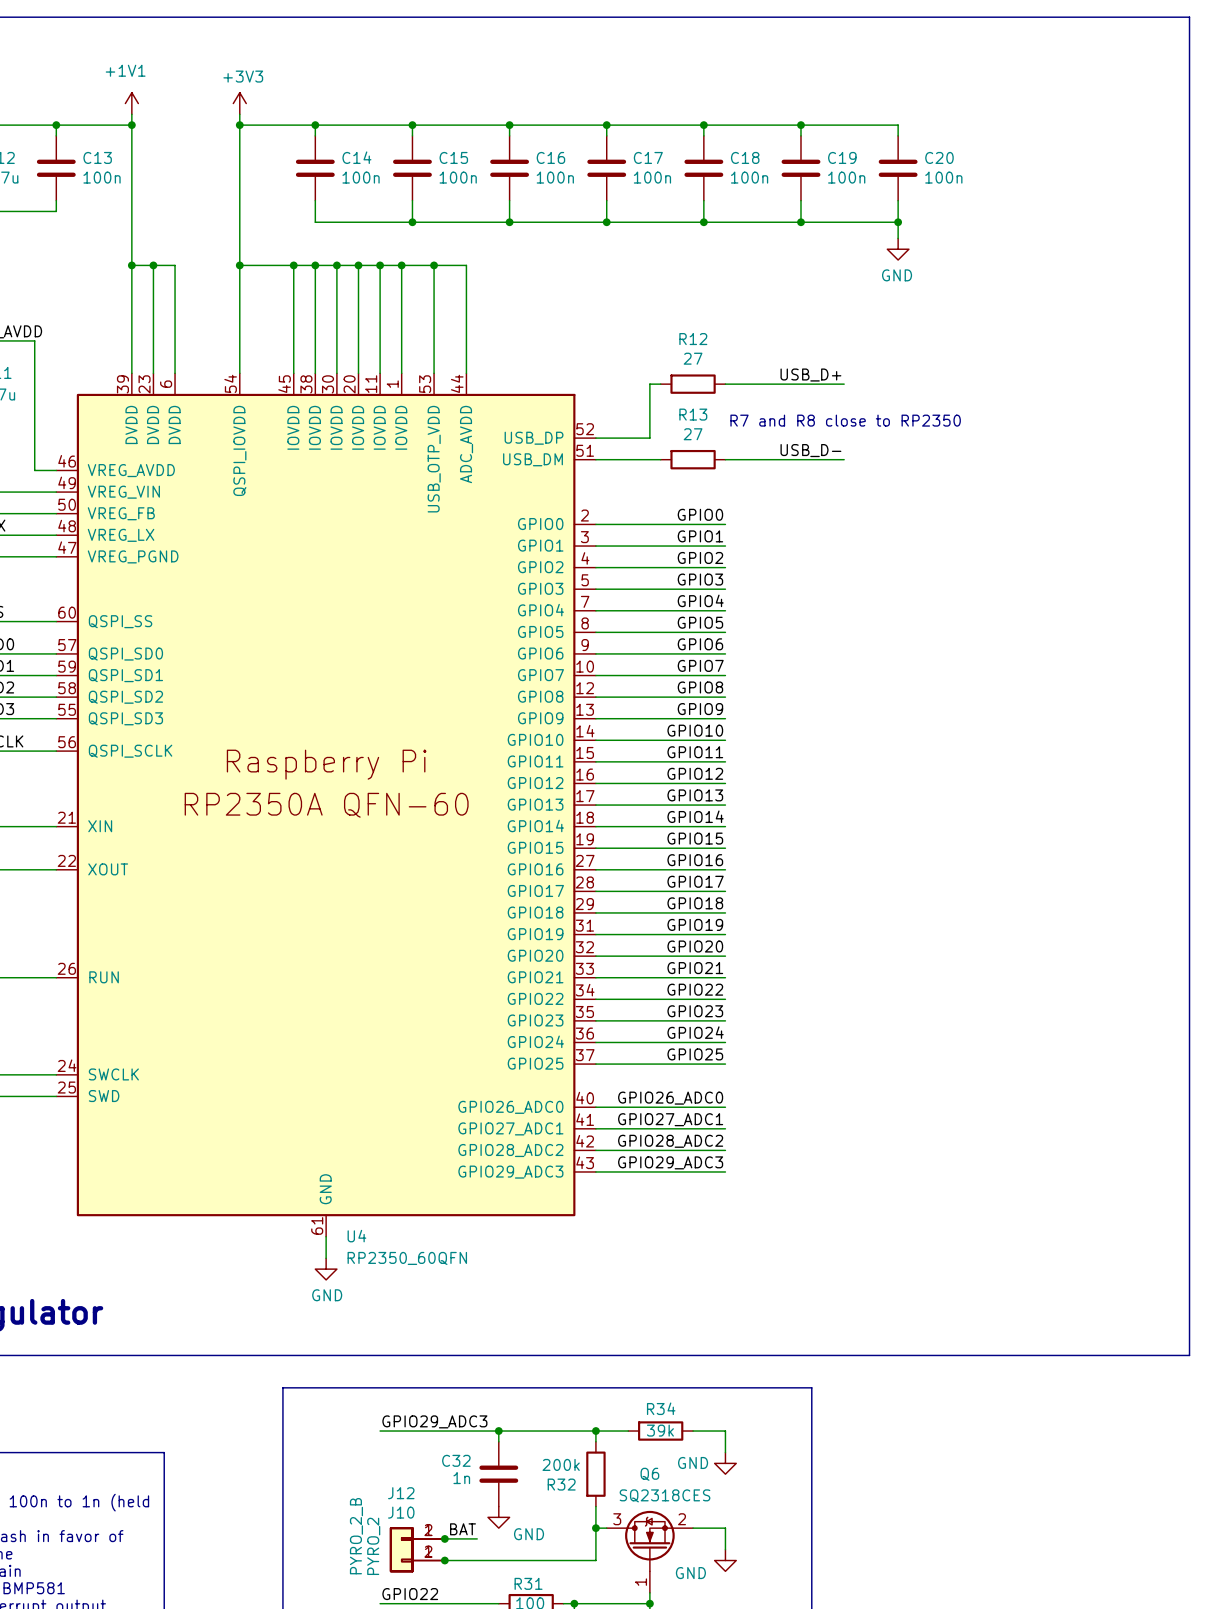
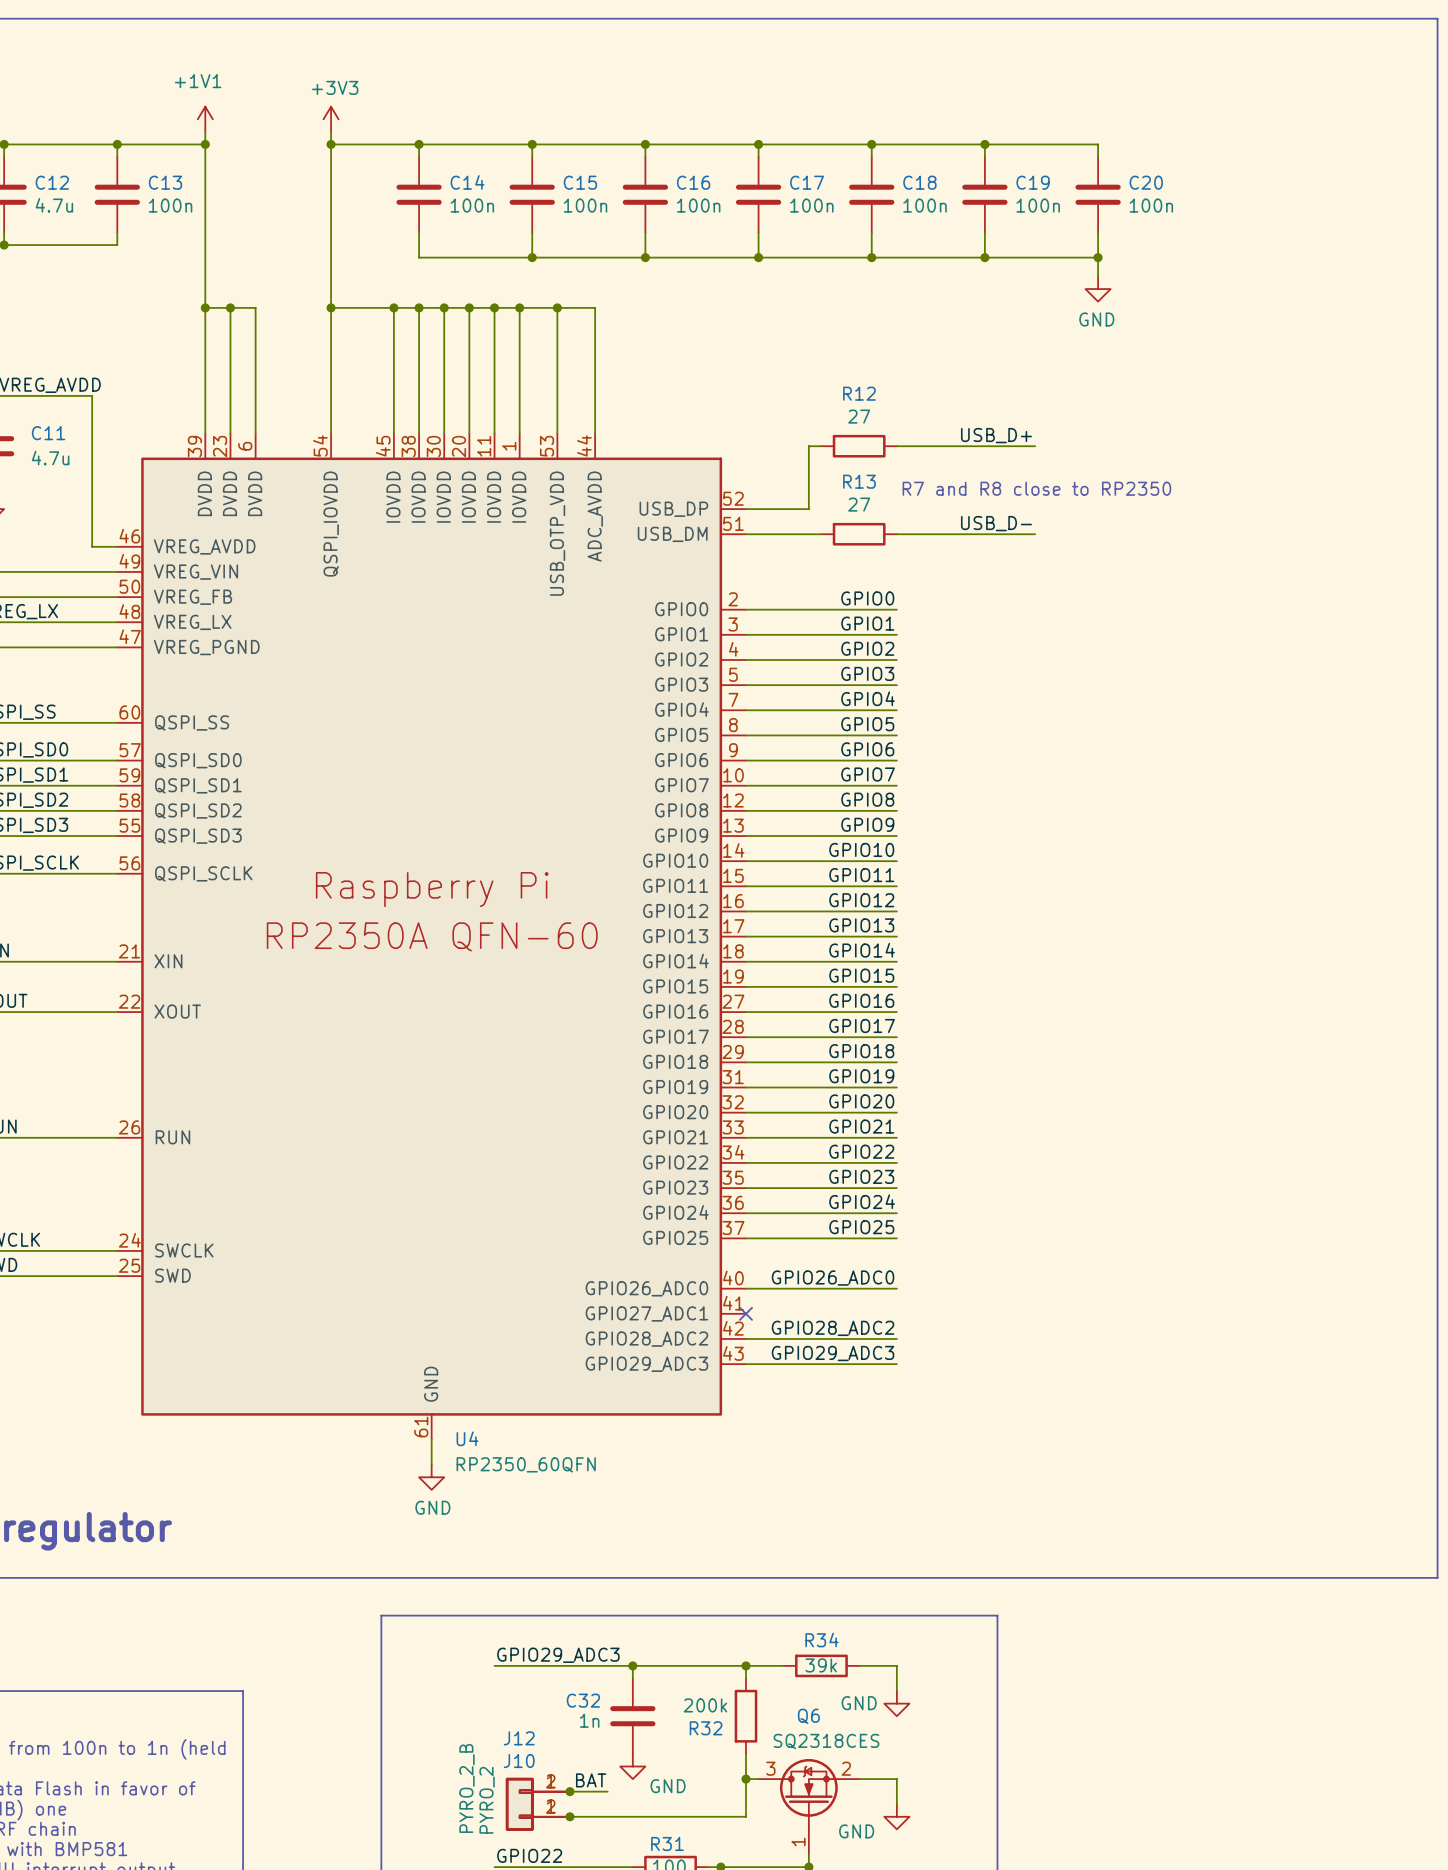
label: GPIO27_ADC1 (670, 1119) -> none
wire: (595, 1128) (725, 1128) -> none
no-connect mark: none -> (746, 1313)

